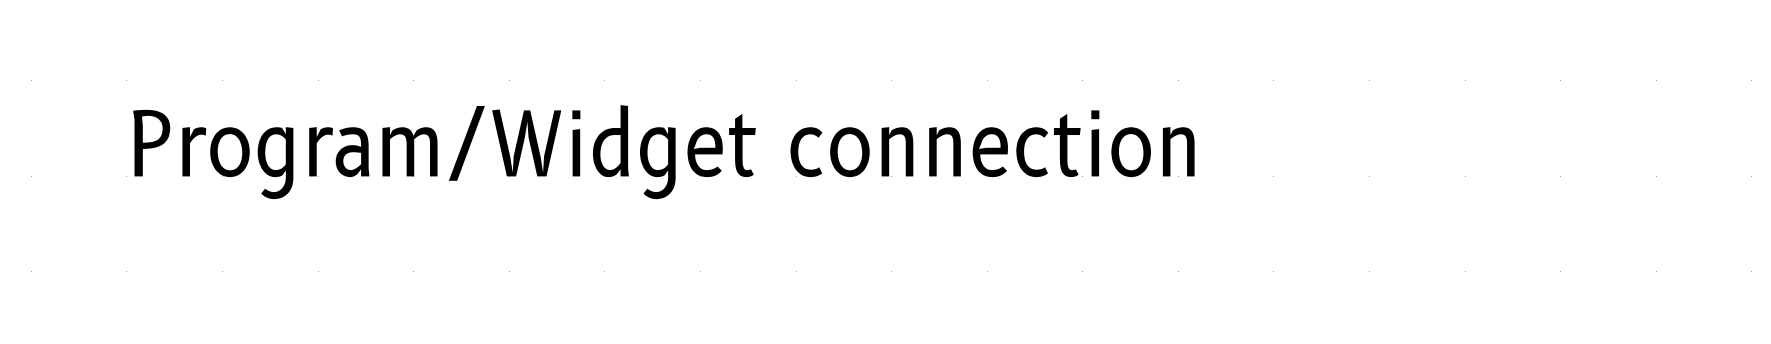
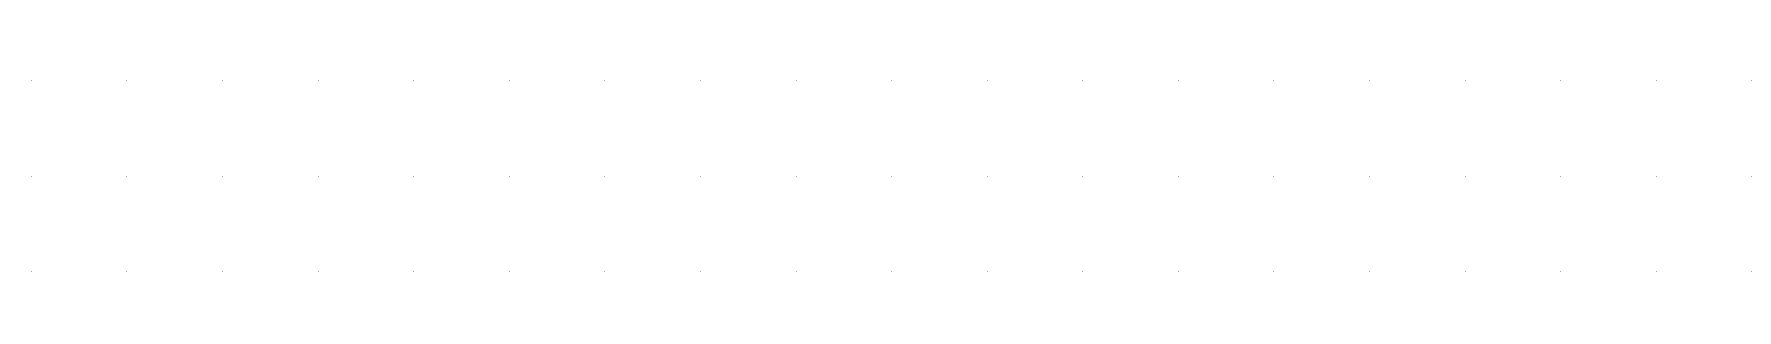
text: Program/Widget connection (663, 152) -> none

